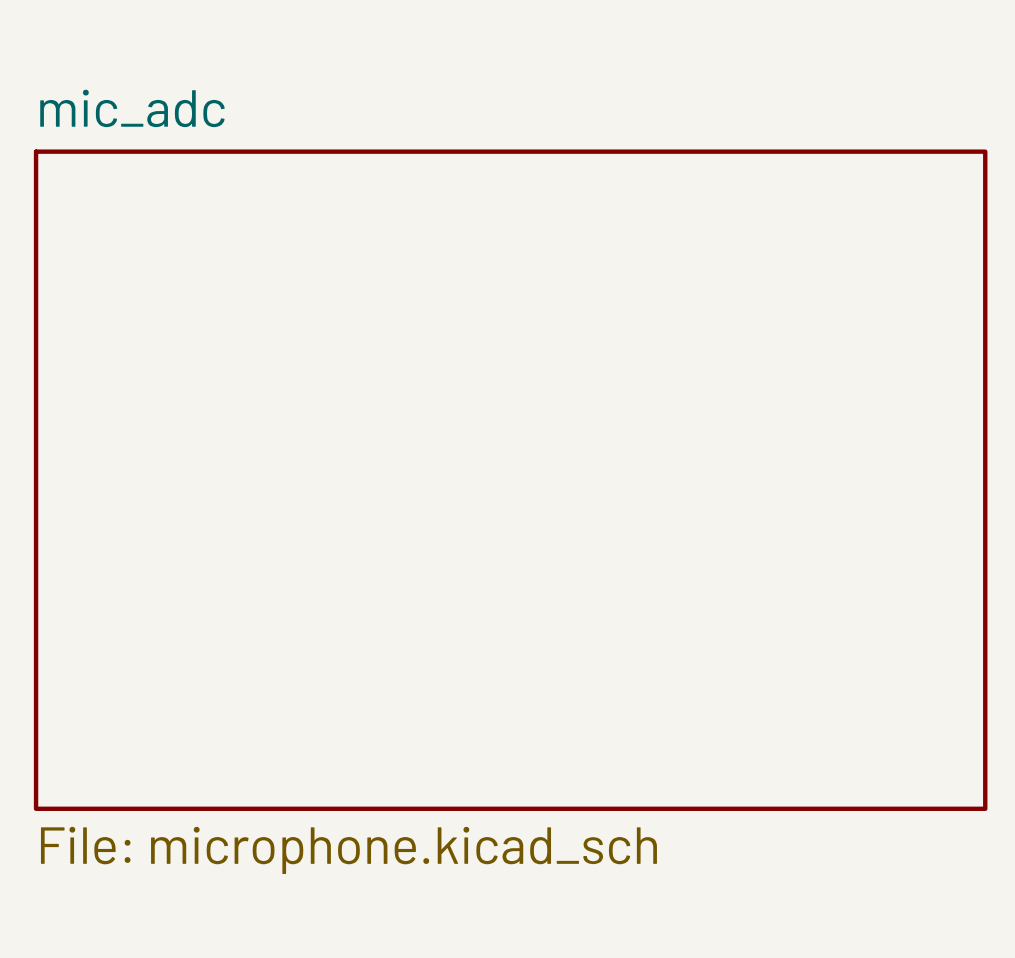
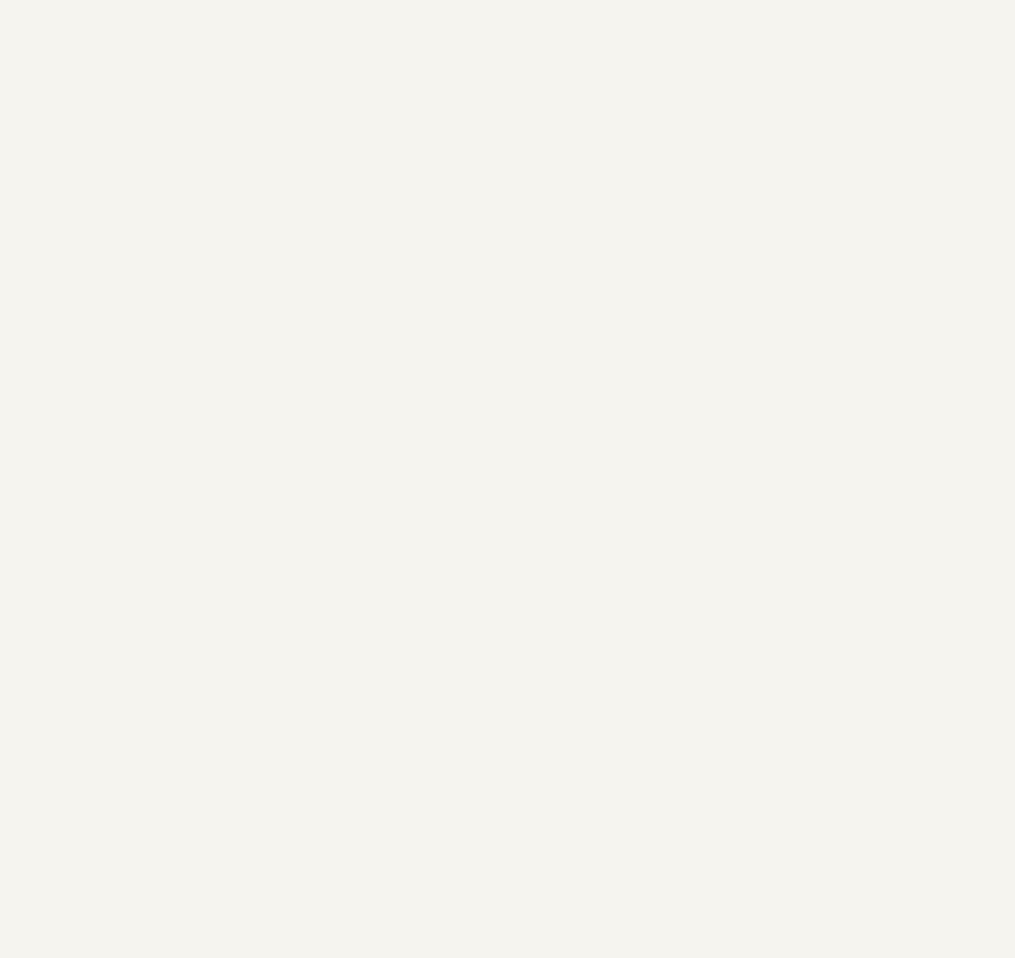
sheet mic_adc: File: microphone.kicad_sch (510, 480) -> none

